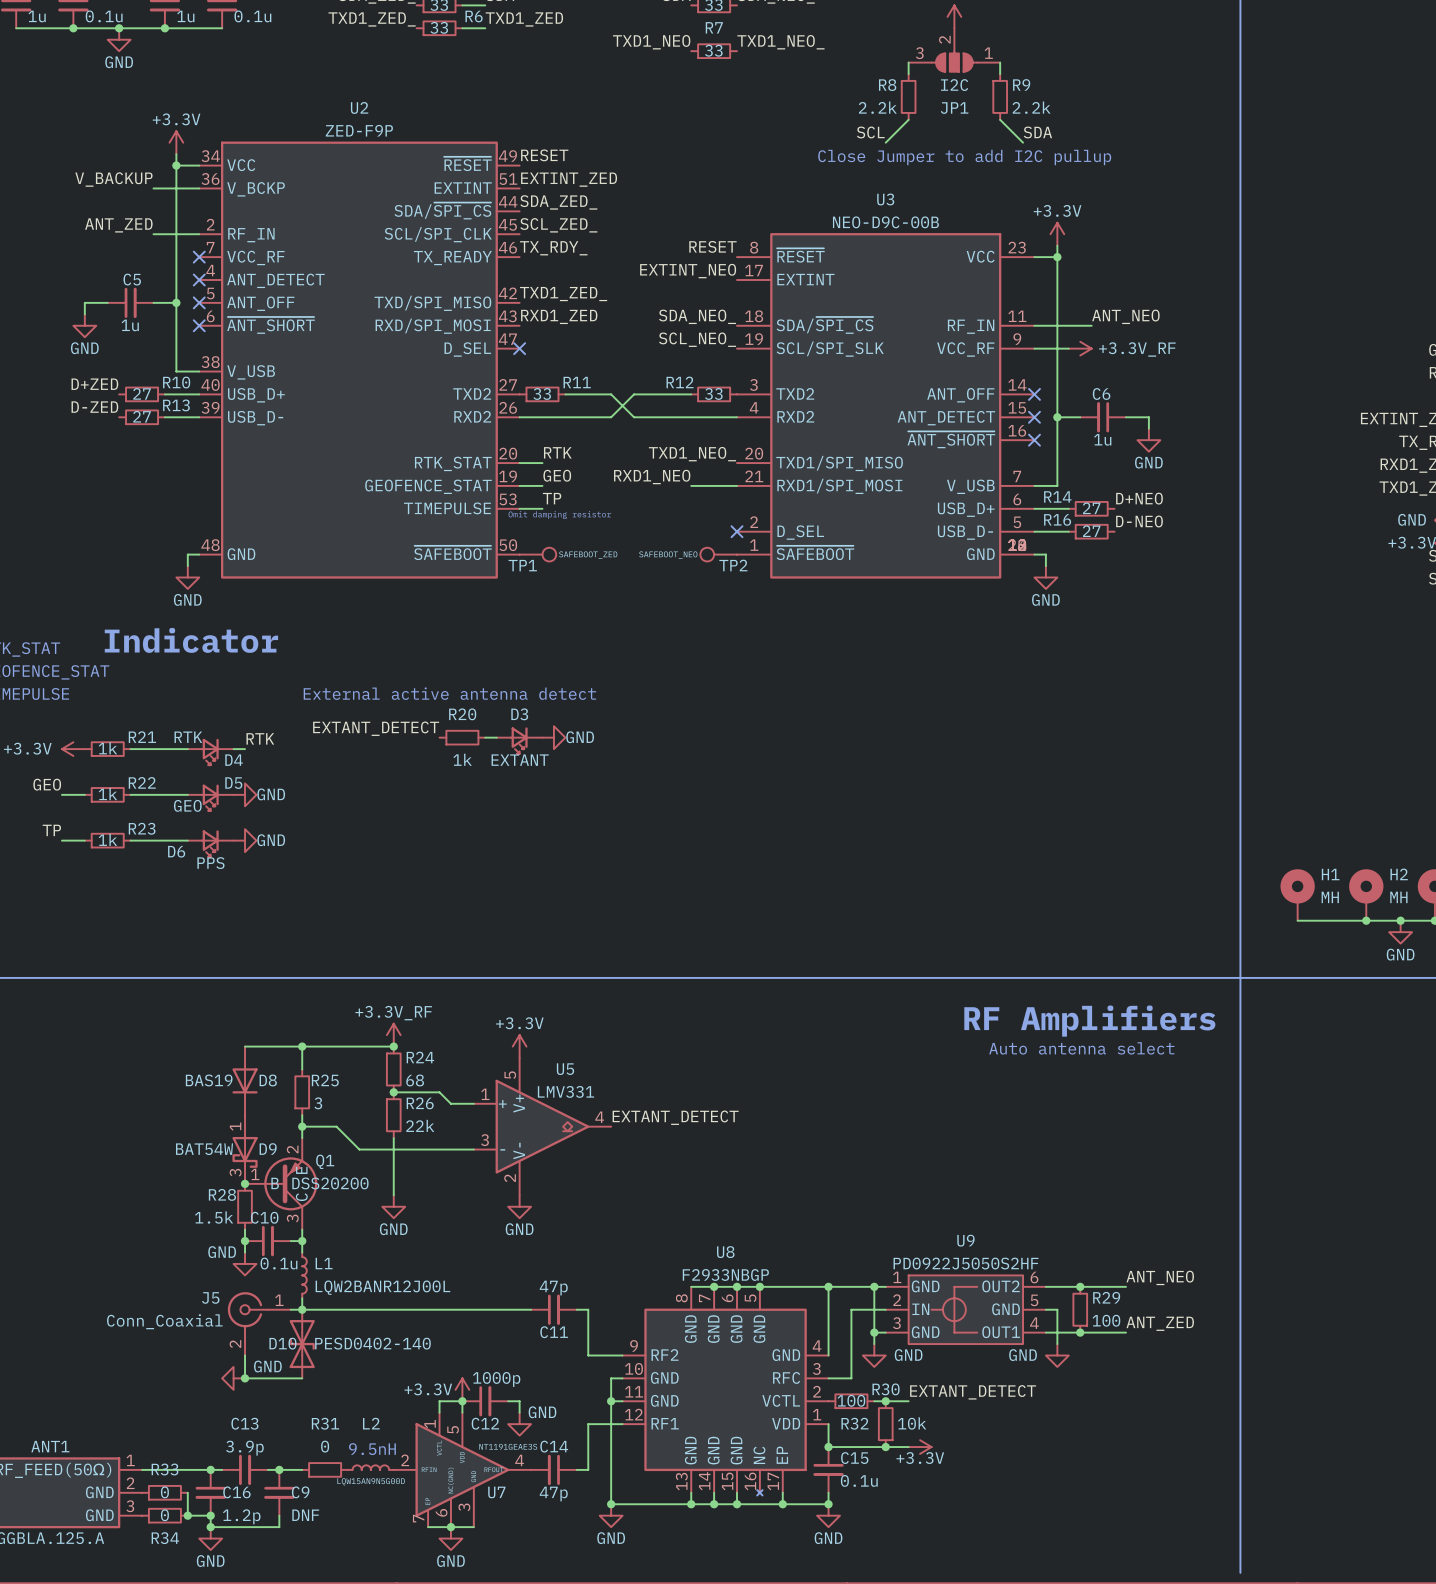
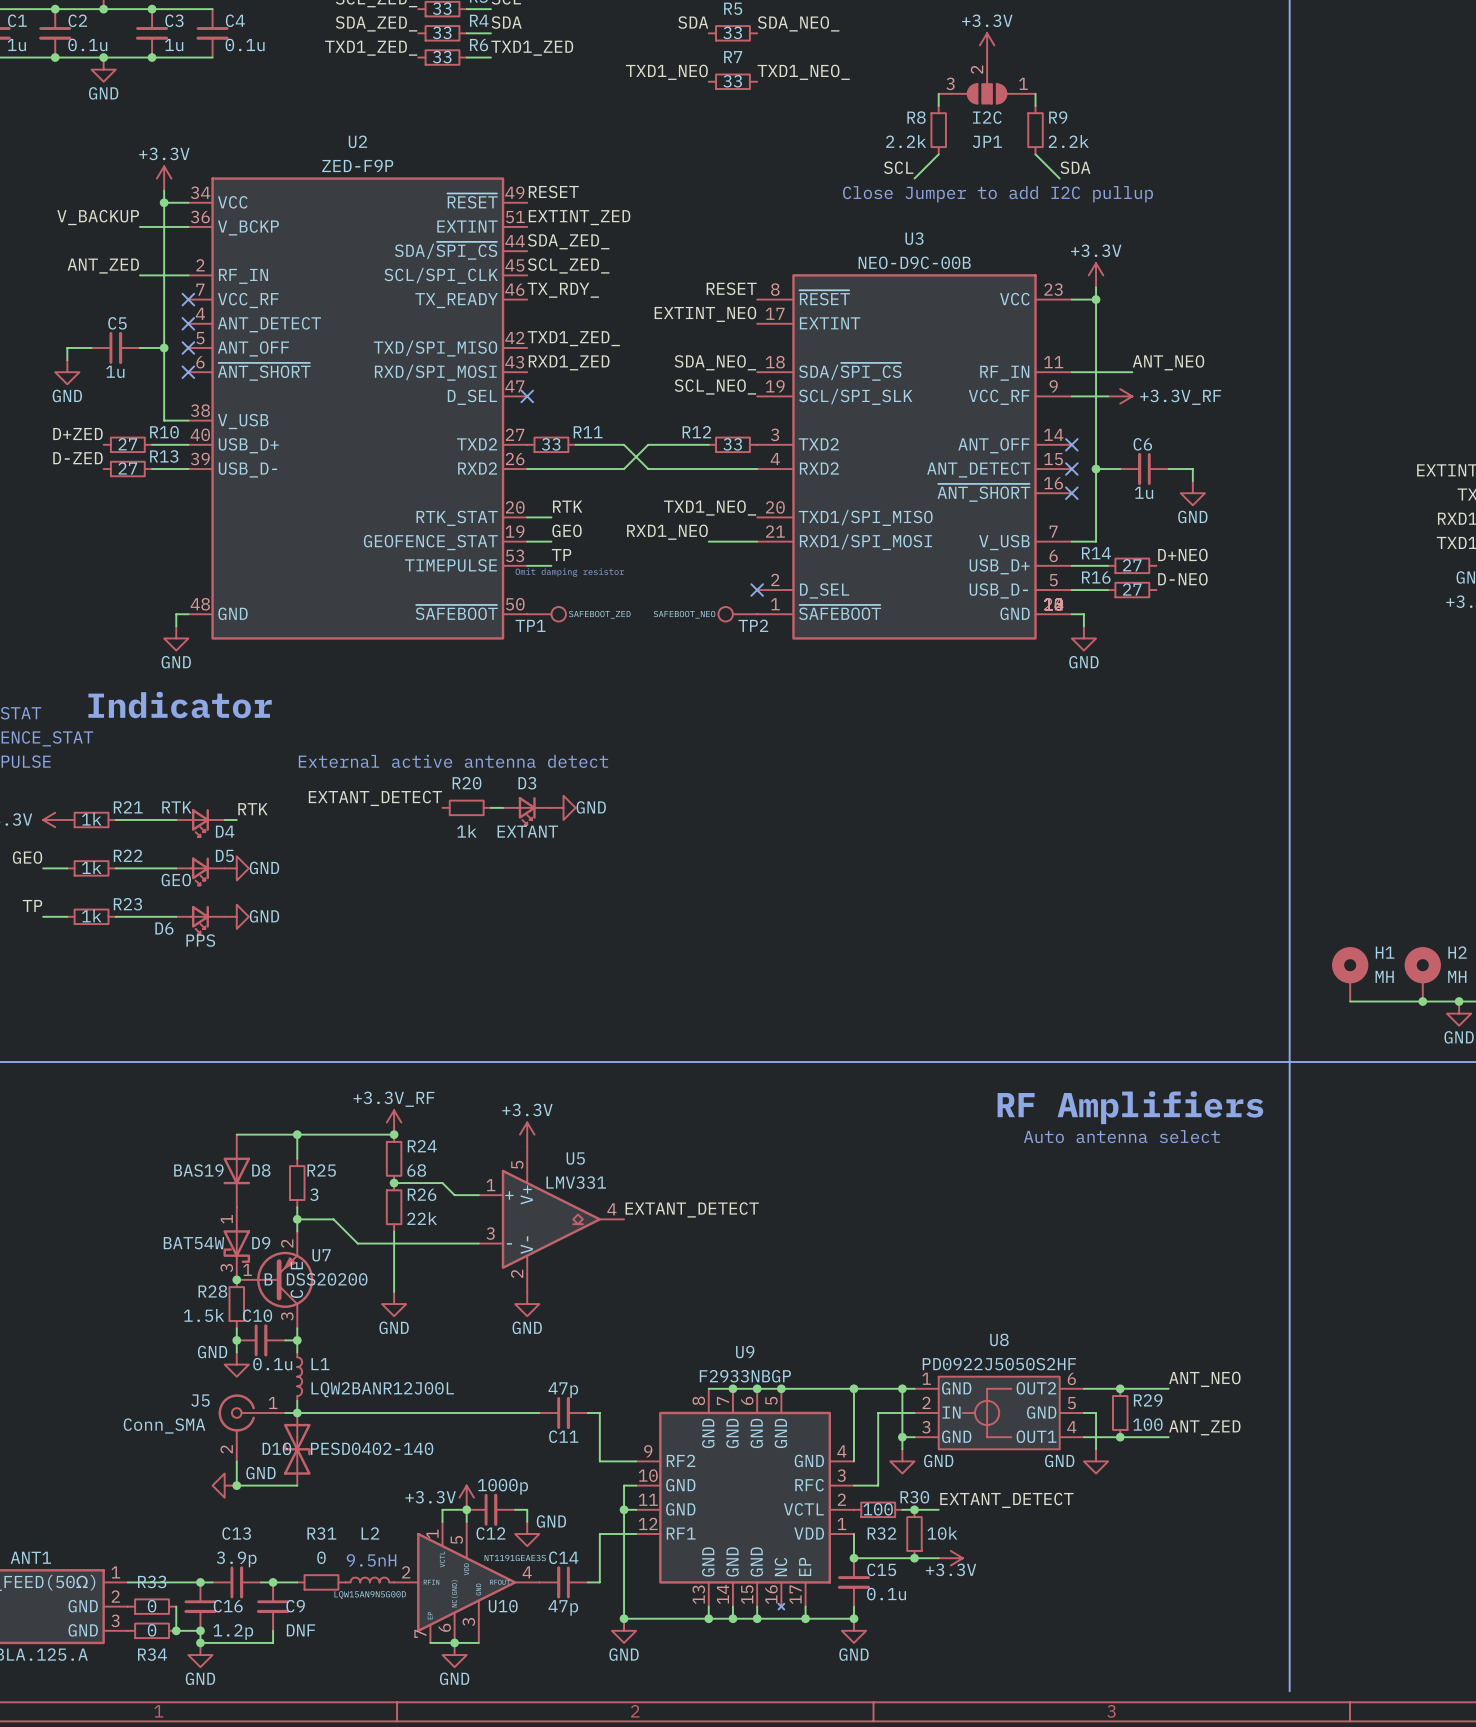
Q1 name: Q1 (325, 1161) -> U7 (321, 1255)
U9 name: U9 (965, 1240) -> U8 (999, 1339)
U8 name: U8 (725, 1252) -> U9 (745, 1352)
J5 value: Conn_Coaxial (164, 1321) -> Conn_SMA (164, 1426)
U7 name: U7 (496, 1492) -> U10 (503, 1606)

